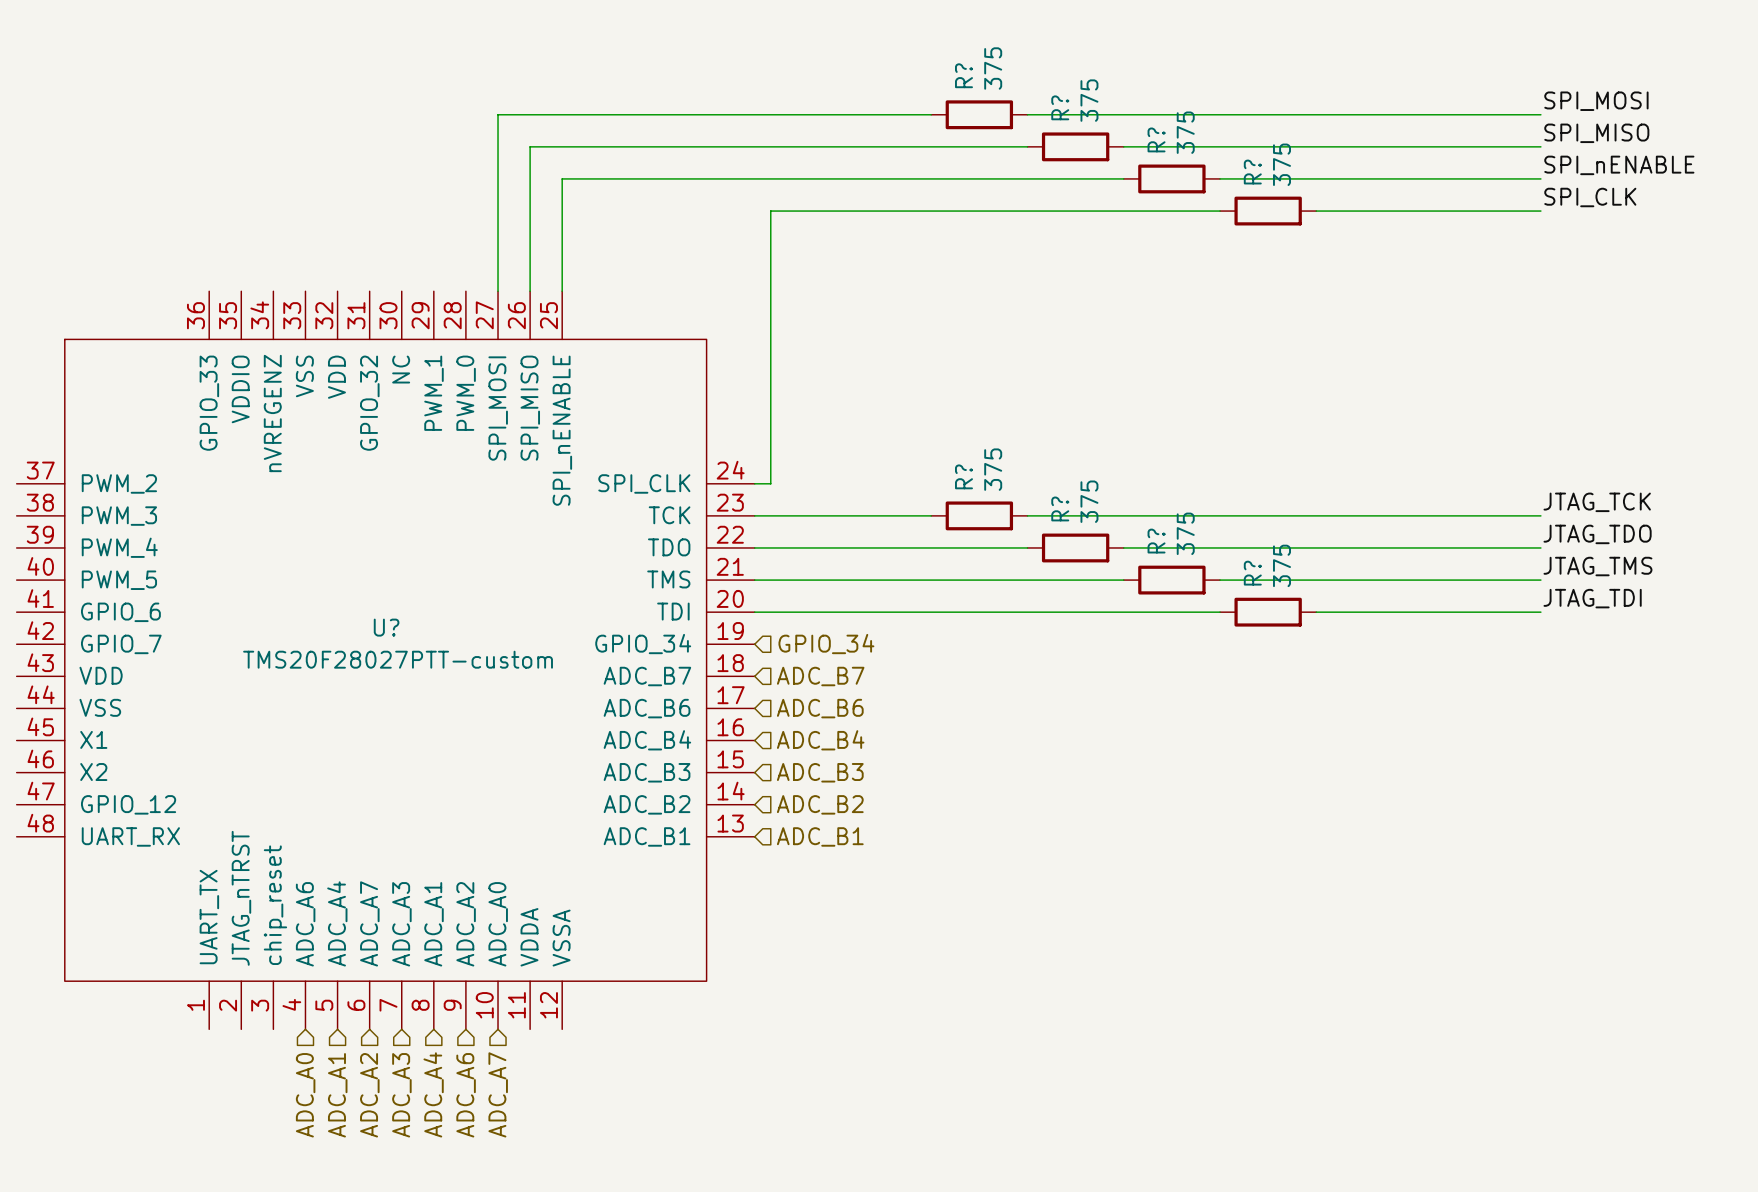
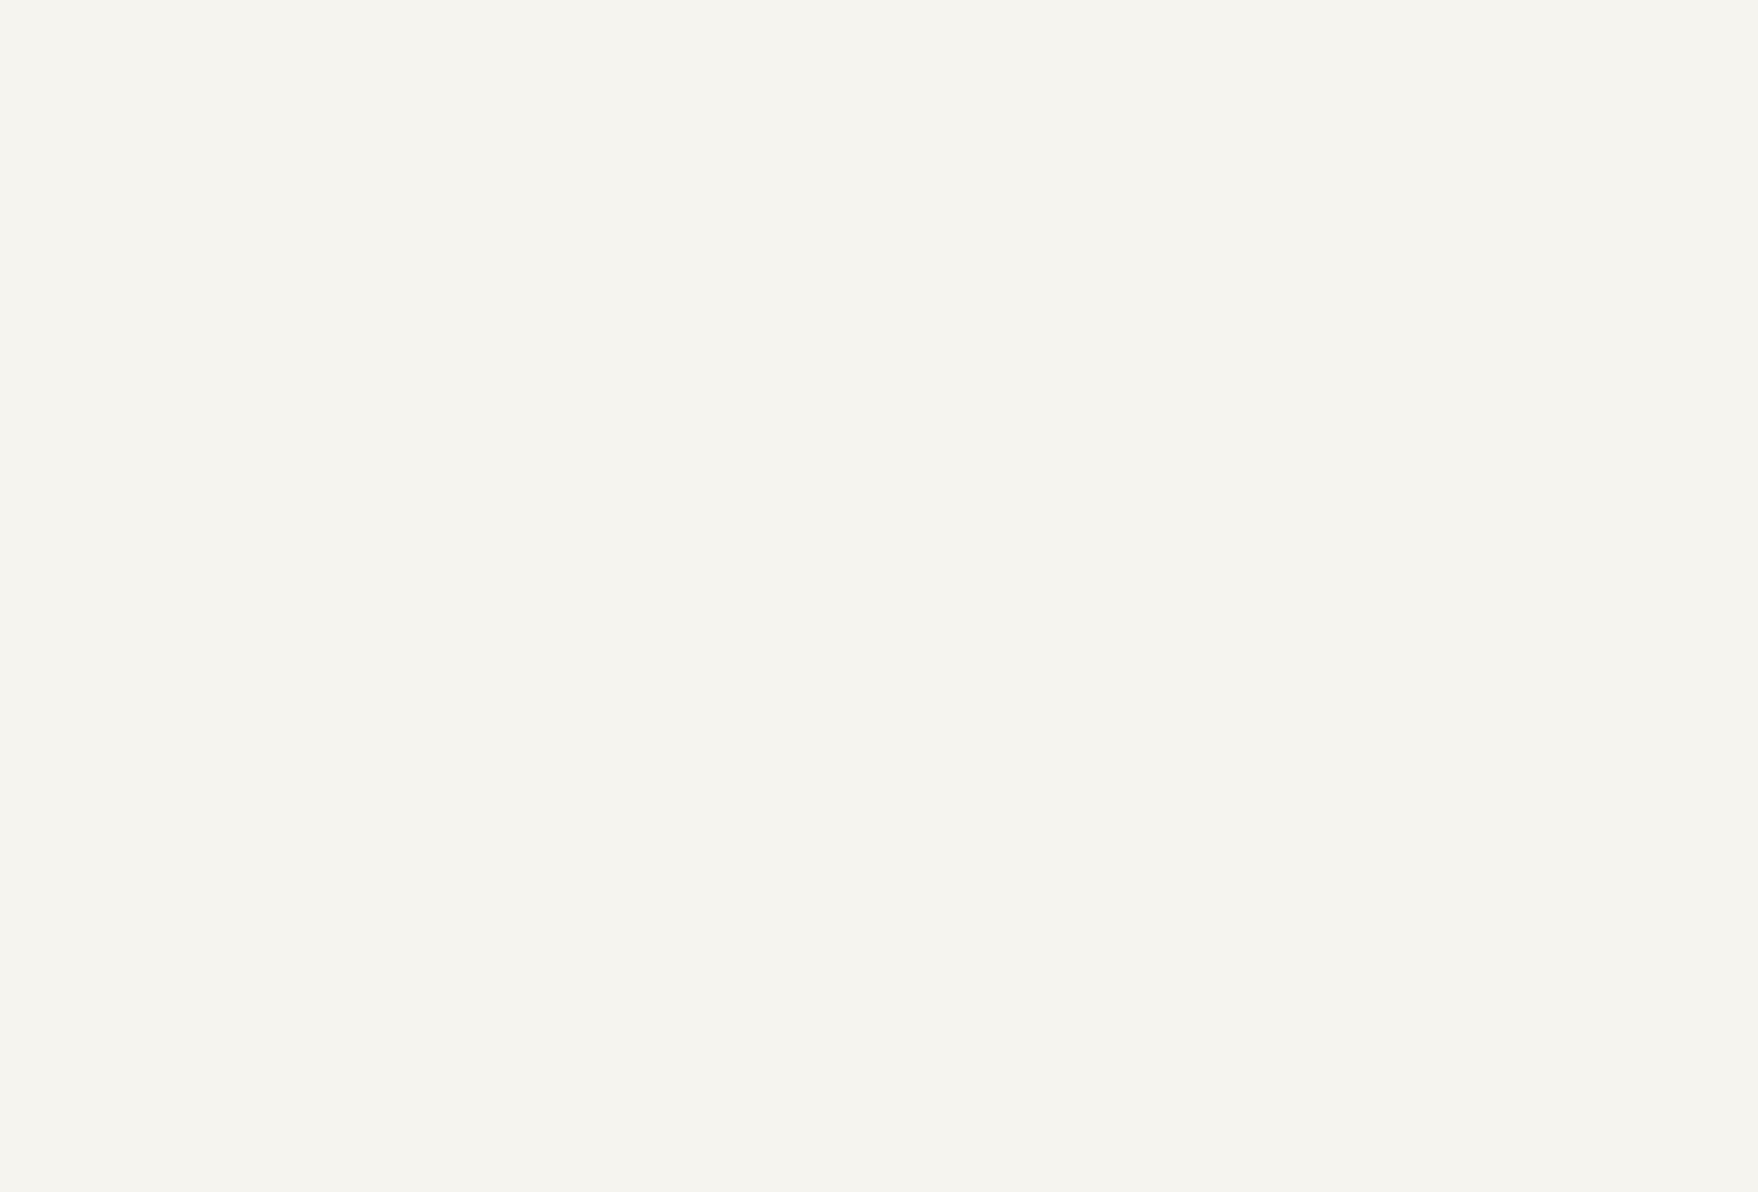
label: SPI_MOSI (1596, 101) -> none
wire: (931, 114) (498, 114) (498, 291) -> none
R?: 375 (979, 114) -> none
wire: (1027, 114) (1540, 114) -> none
label: SPI_MISO (1596, 133) -> none
wire: (1027, 146) (530, 146) (530, 291) -> none
R?: 375 (1075, 146) -> none
wire: (1123, 146) (1540, 146) -> none
label: SPI_nENABLE (1619, 165) -> none
wire: (1123, 178) (562, 178) (562, 291) -> none
R?: 375 (1171, 178) -> none
wire: (1220, 178) (1540, 178) -> none
label: SPI_CLK (1590, 197) -> none
wire: (1220, 211) (770, 211) (770, 483) (754, 483) -> none
R?: 375 (1268, 211) -> none
wire: (1316, 211) (1540, 211) -> none
label: JTAG_TCK (1597, 502) -> none
wire: (754, 515) (931, 515) -> none
R?: 375 (979, 515) -> none
wire: (1027, 515) (1540, 515) -> none
label: JTAG_TDO (1597, 534) -> none
wire: (754, 547) (1027, 547) -> none
R?: 375 (1075, 547) -> none
wire: (1123, 547) (1540, 547) -> none
label: JTAG_TMS (1597, 566) -> none
wire: (754, 580) (1123, 580) -> none
R?: 375 (1171, 580) -> none
wire: (1220, 580) (1540, 580) -> none
label: JTAG_TDI (1592, 598) -> none
wire: (754, 612) (1220, 612) -> none
R?: 375 (1268, 612) -> none
wire: (1316, 612) (1540, 612) -> none
hierarchical label: GPIO_34 (826, 644) -> none
U?: TMS20F28027PTT-custom (385, 660) -> none
hierarchical label: ADC_B7 (820, 676) -> none
hierarchical label: ADC_B6 (820, 708) -> none
hierarchical label: ADC_B4 (820, 740) -> none
hierarchical label: ADC_B3 (820, 772) -> none
hierarchical label: ADC_B2 (820, 804) -> none
hierarchical label: ADC_B1 (820, 836) -> none
hierarchical label: ADC_A4 (433, 1094) -> none
hierarchical label: ADC_A7 (498, 1094) -> none
hierarchical label: ADC_A0 (305, 1095) -> none
hierarchical label: ADC_A1 (337, 1095) -> none
hierarchical label: ADC_A2 (369, 1095) -> none
hierarchical label: ADC_A3 (401, 1095) -> none
hierarchical label: ADC_A6 (466, 1095) -> none

